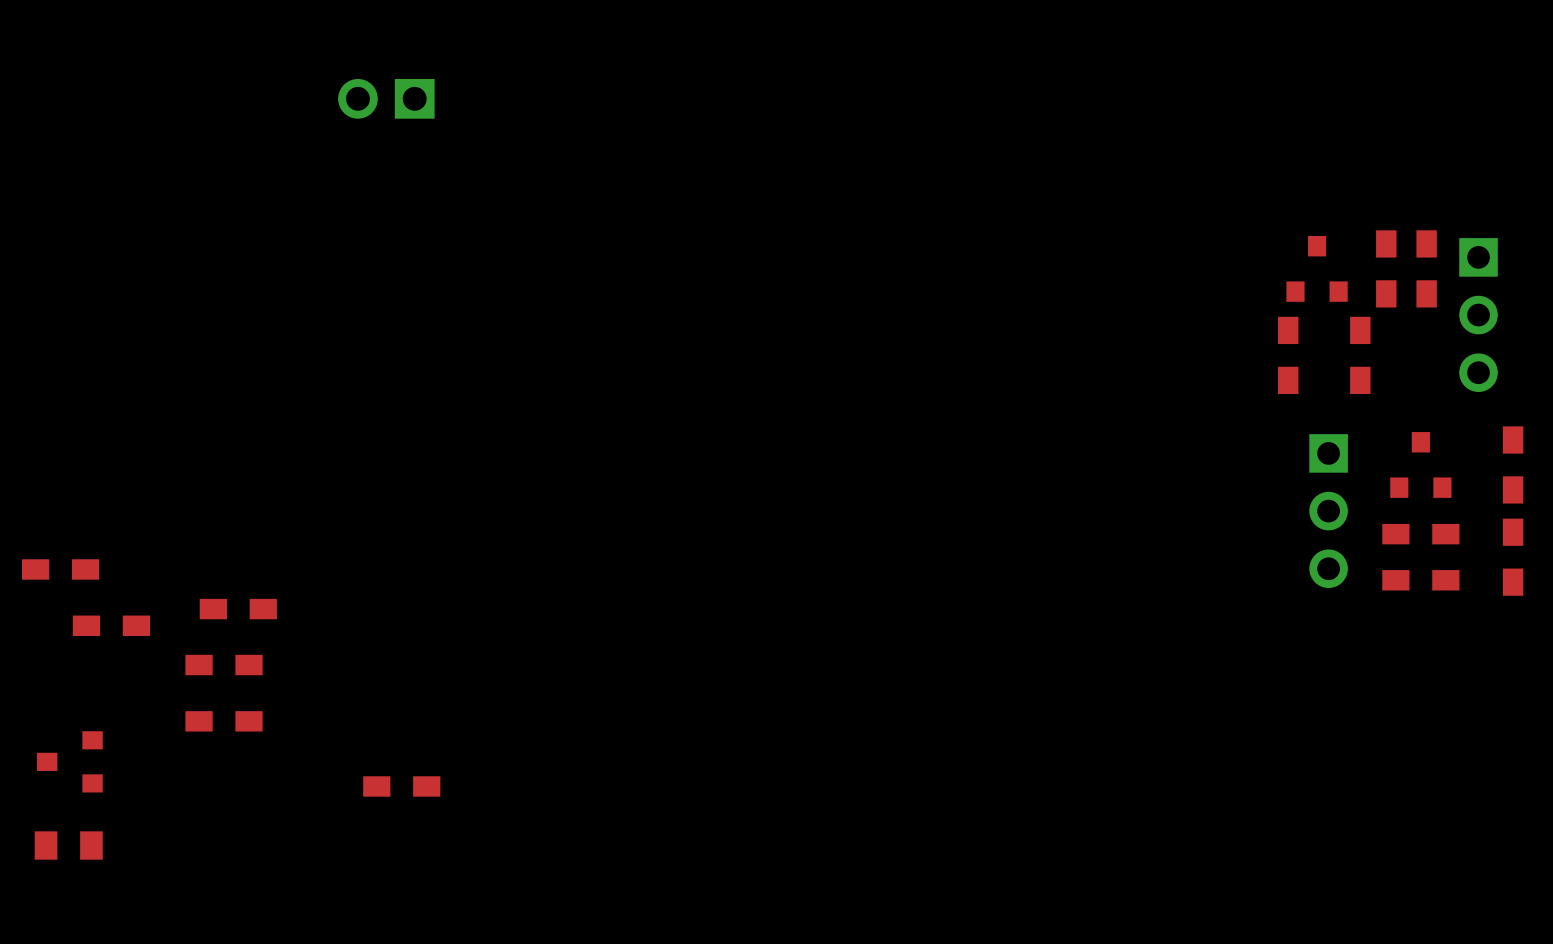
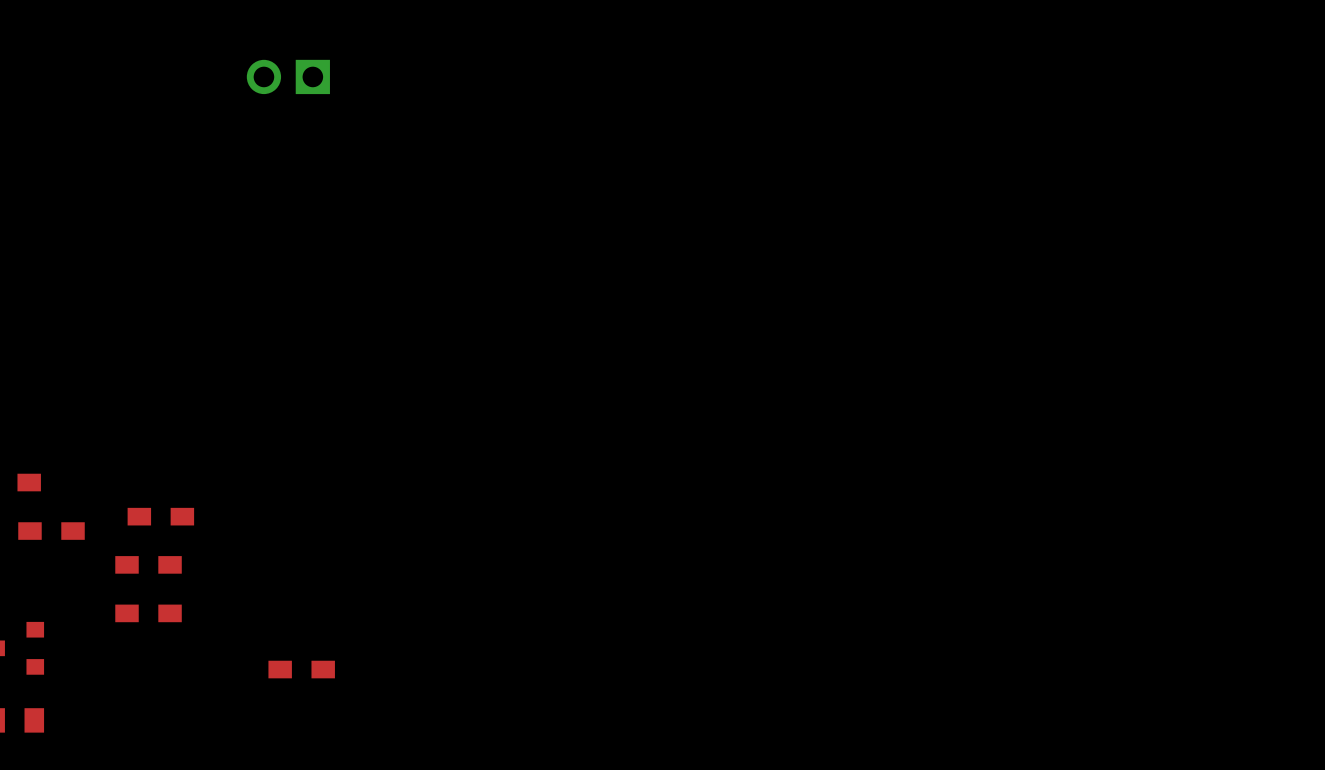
part: (1317, 268) -> none
part: (1386, 268) -> none
part: (1426, 268) -> none
part: (1478, 315) -> none
part: (1288, 355) -> none
part: (1360, 355) -> none
part: (1420, 464) -> none
part: (1513, 464) -> none
part: (1328, 511) -> none
part: (1420, 534) -> none
part: (1513, 557) -> none
part: (1420, 580) -> none

